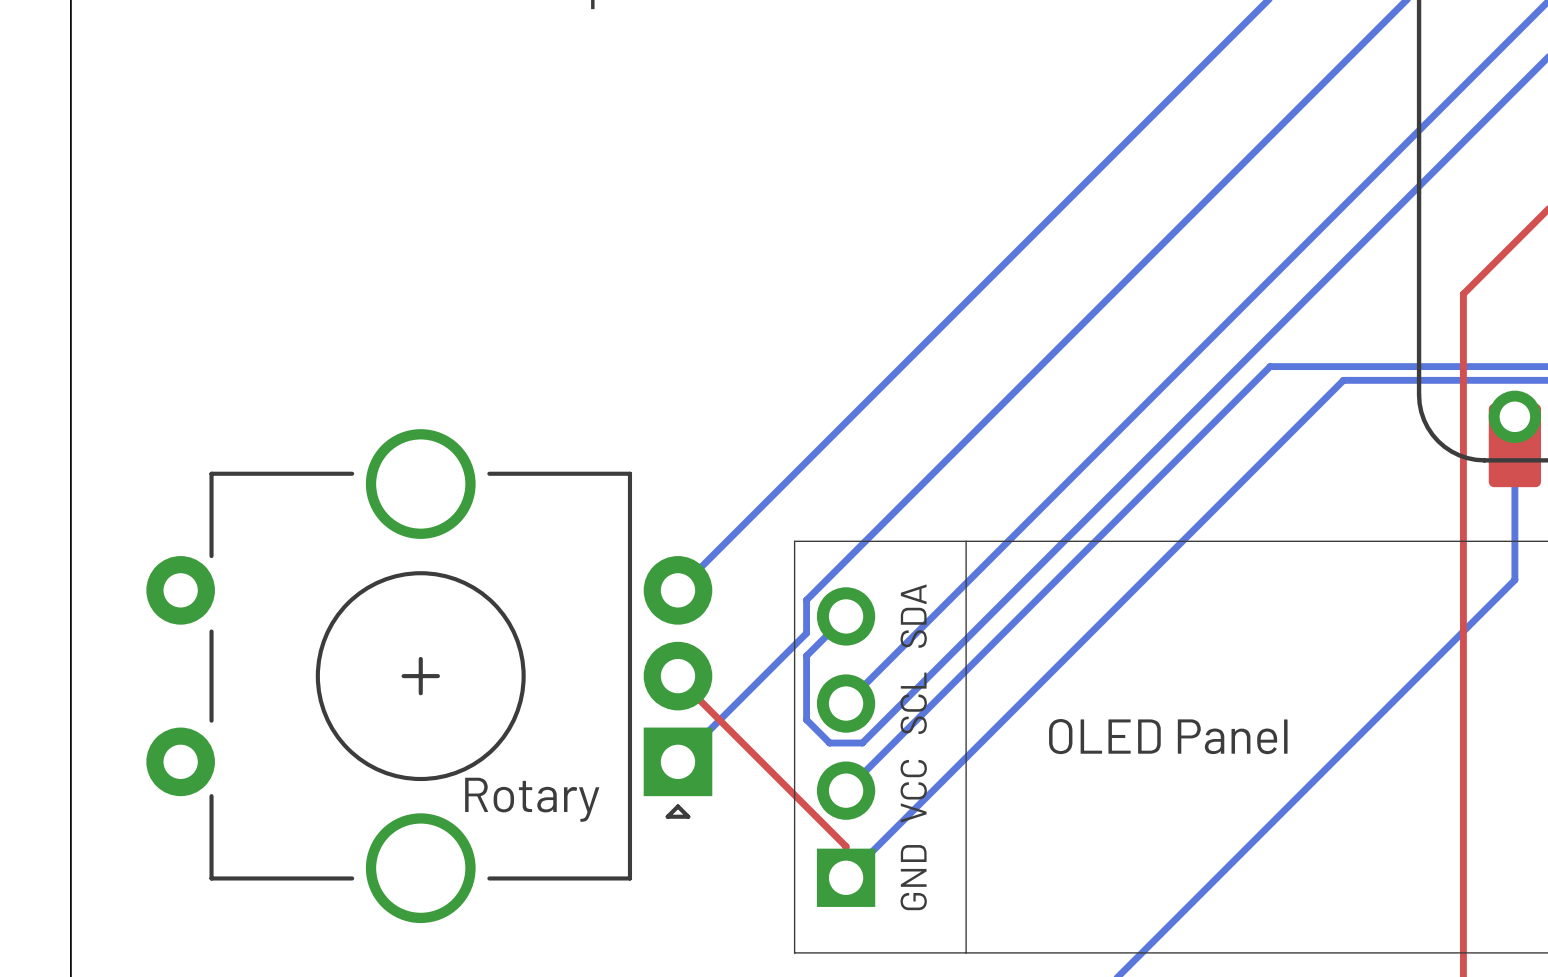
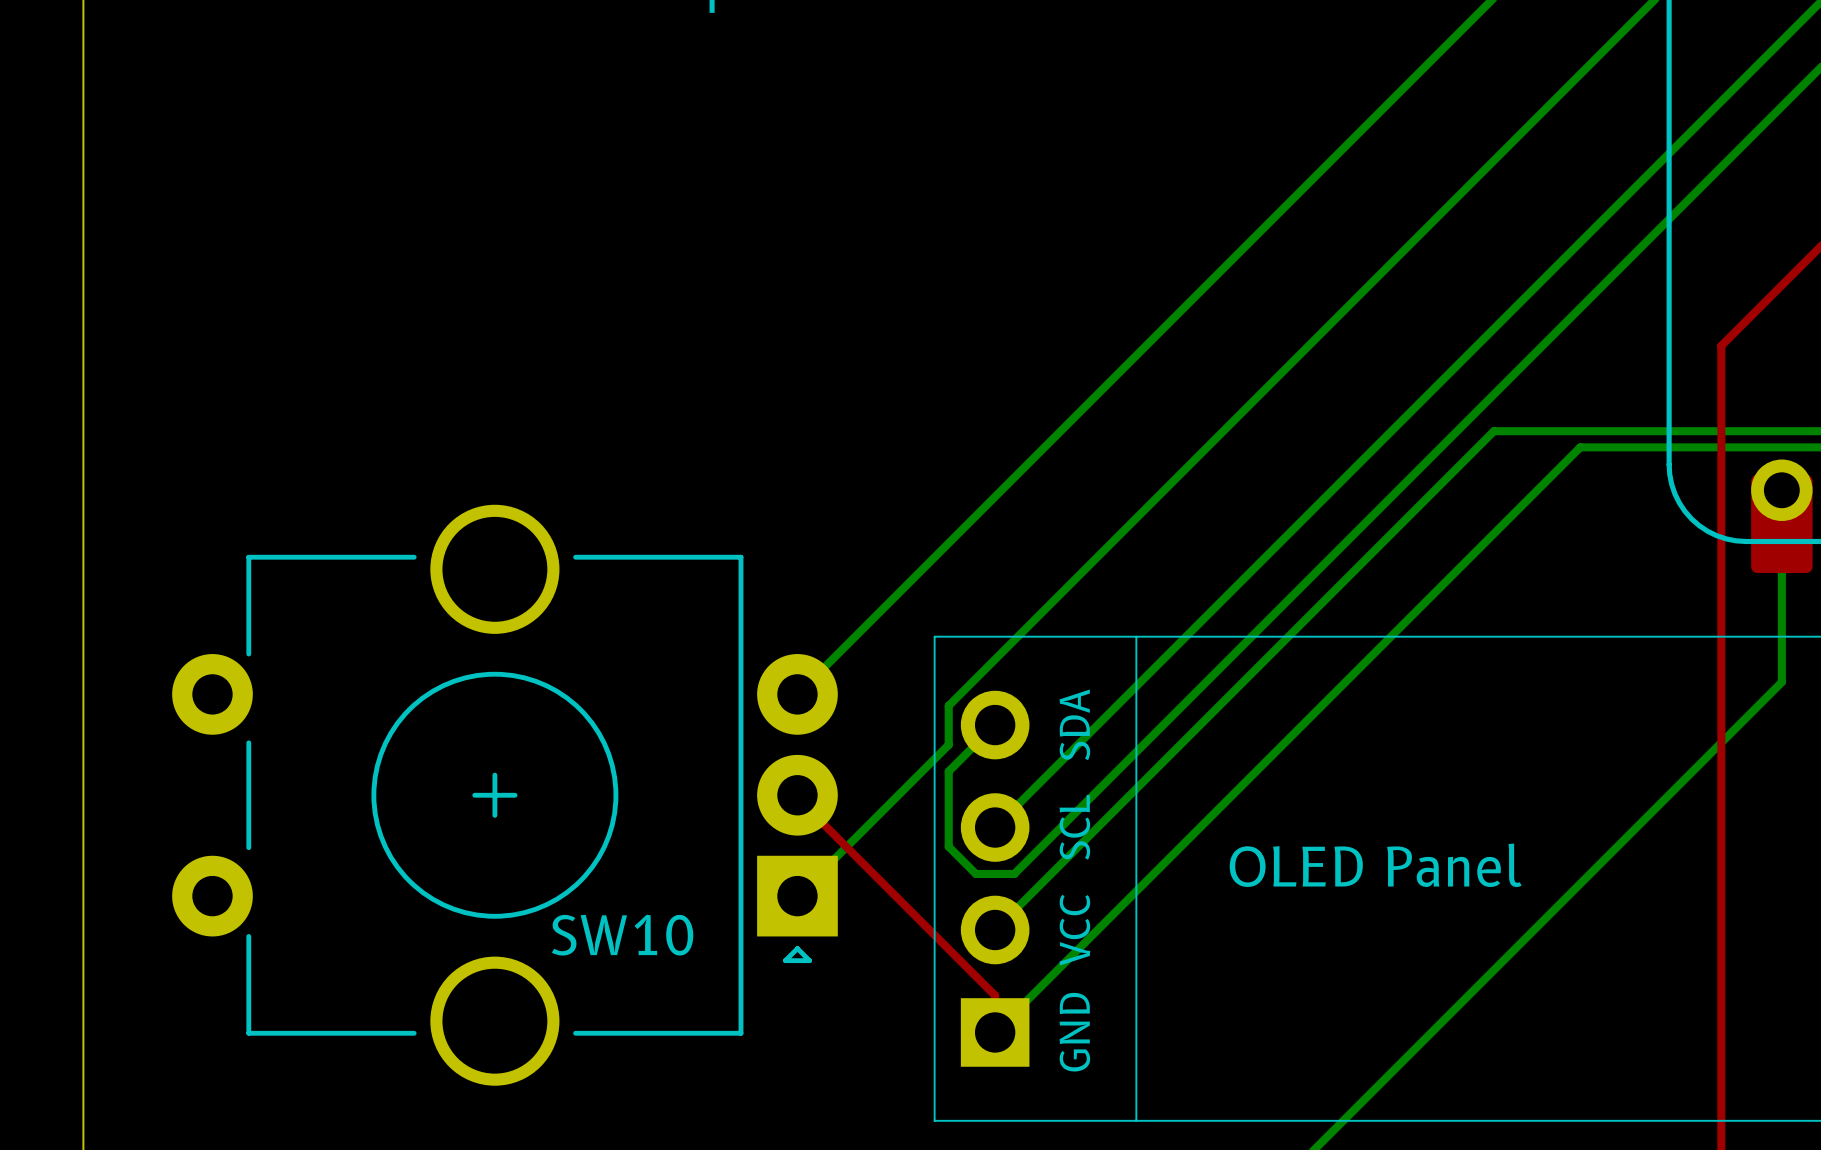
Rotary name: Rotary (532, 799) -> SW10 (622, 935)

